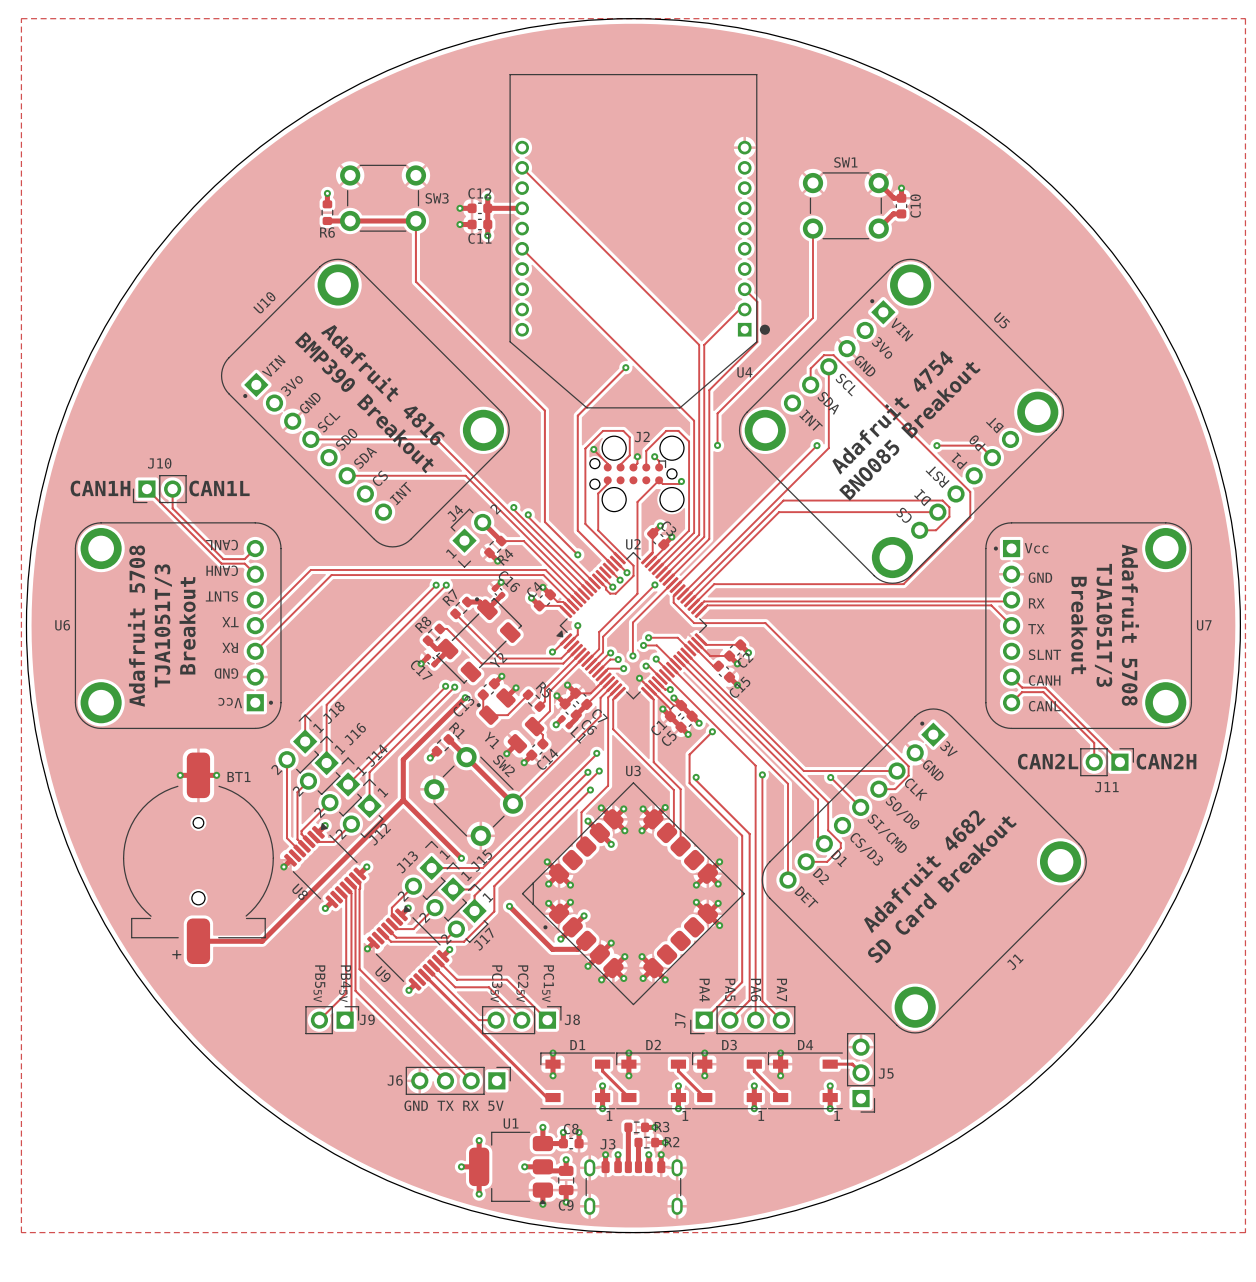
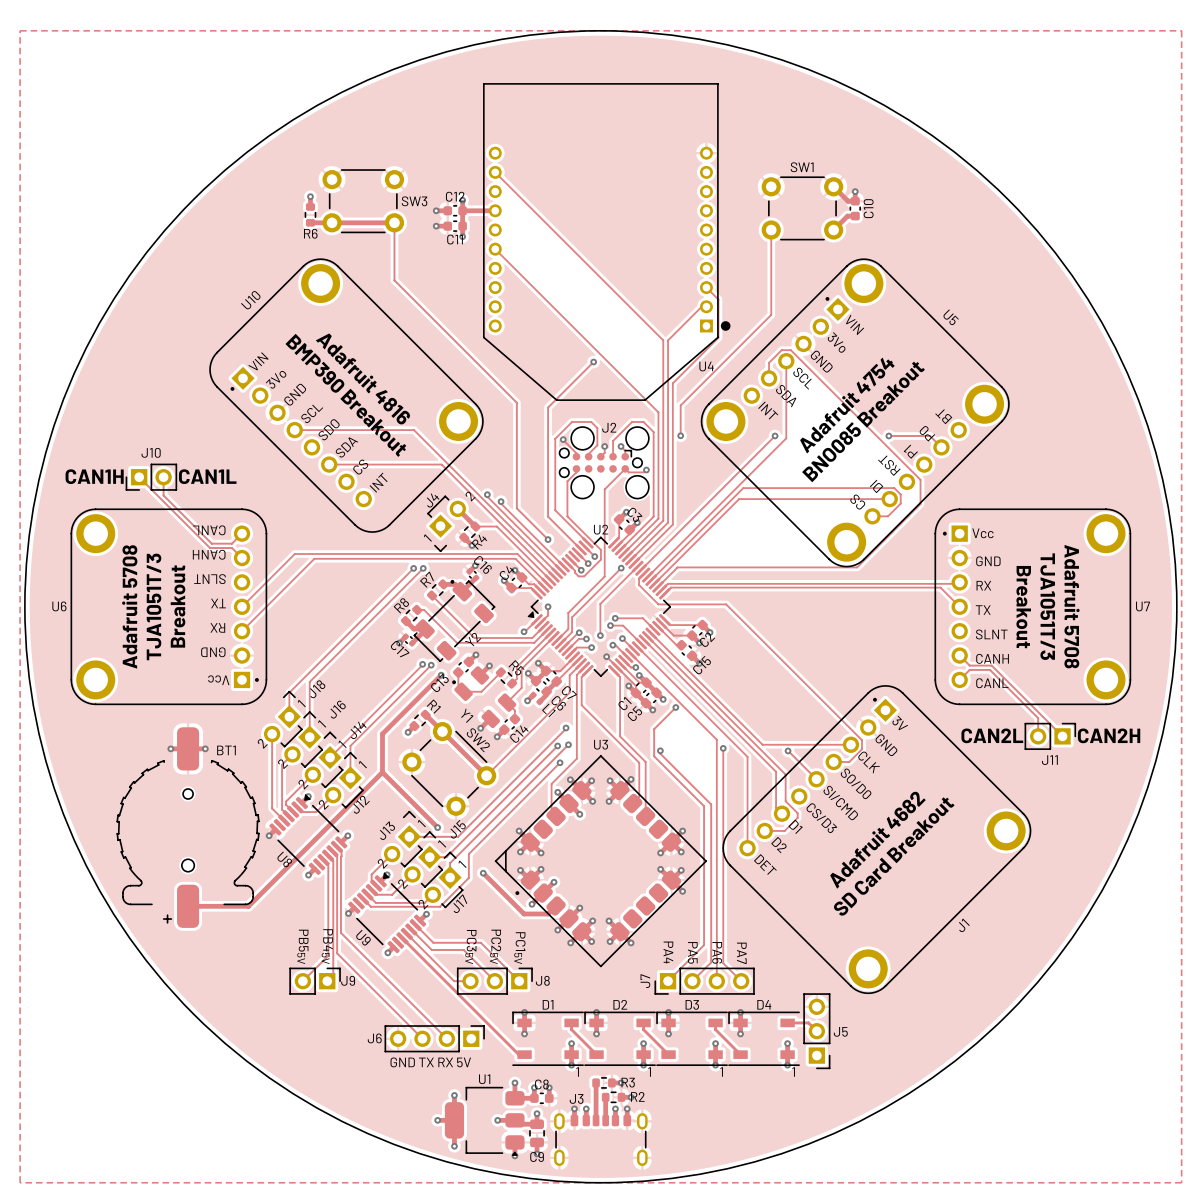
BT1 footprint: [123, 752, 274, 965] -> [116, 727, 260, 928]

